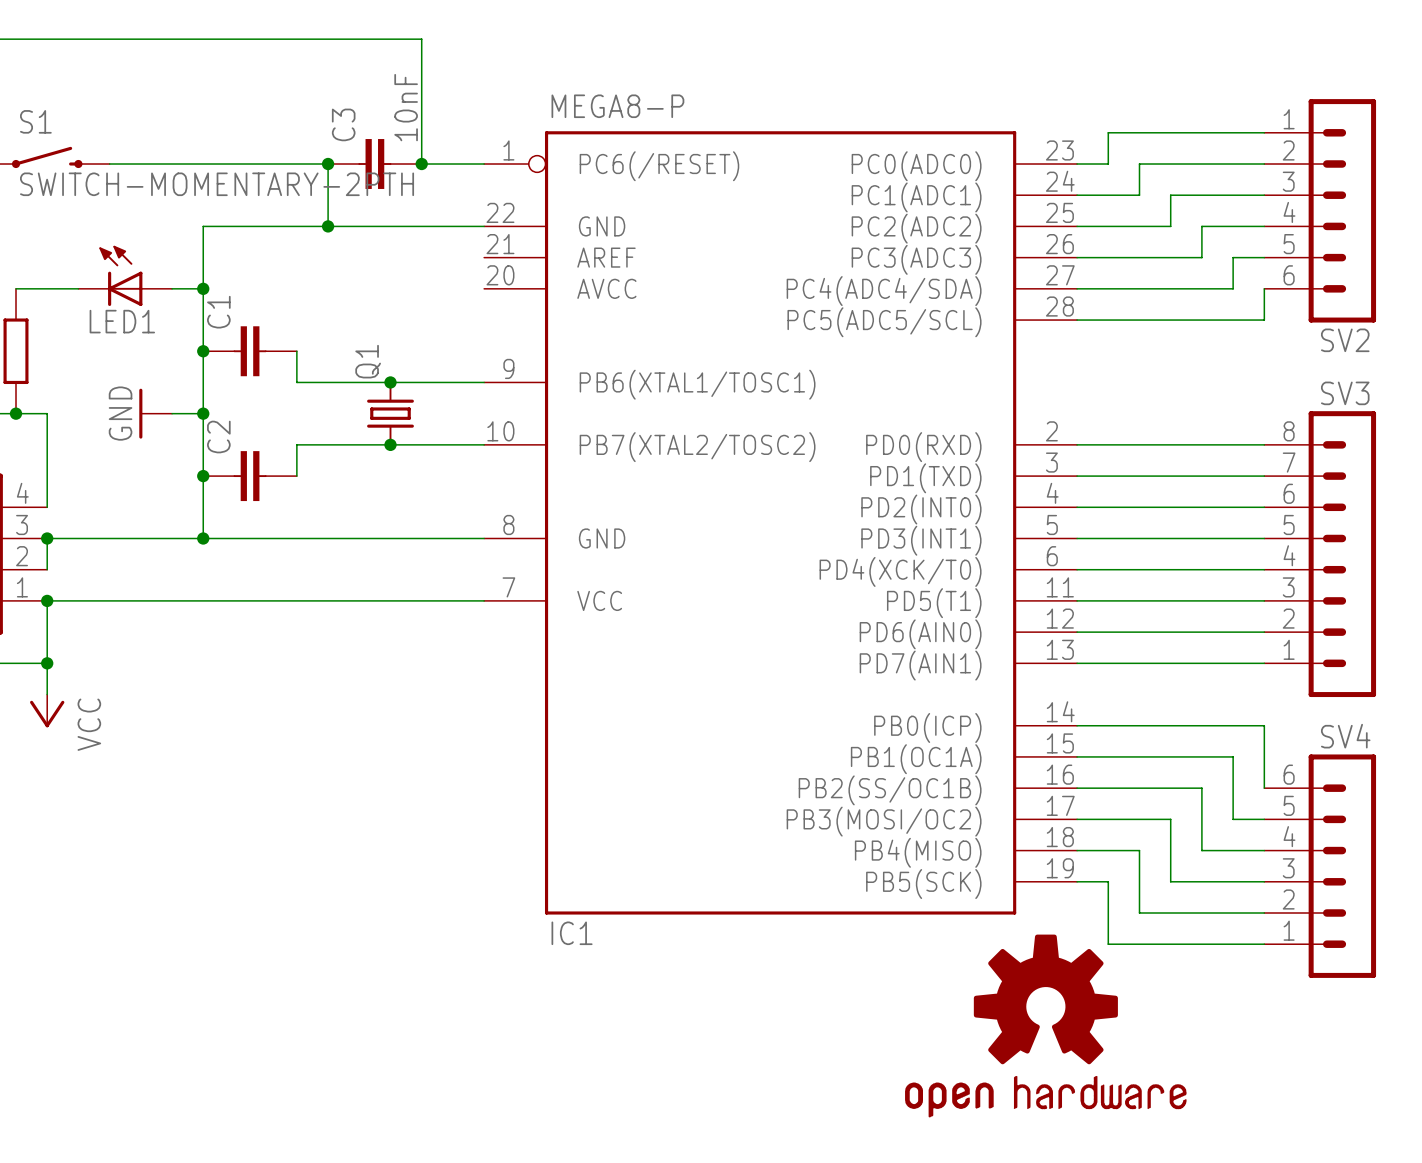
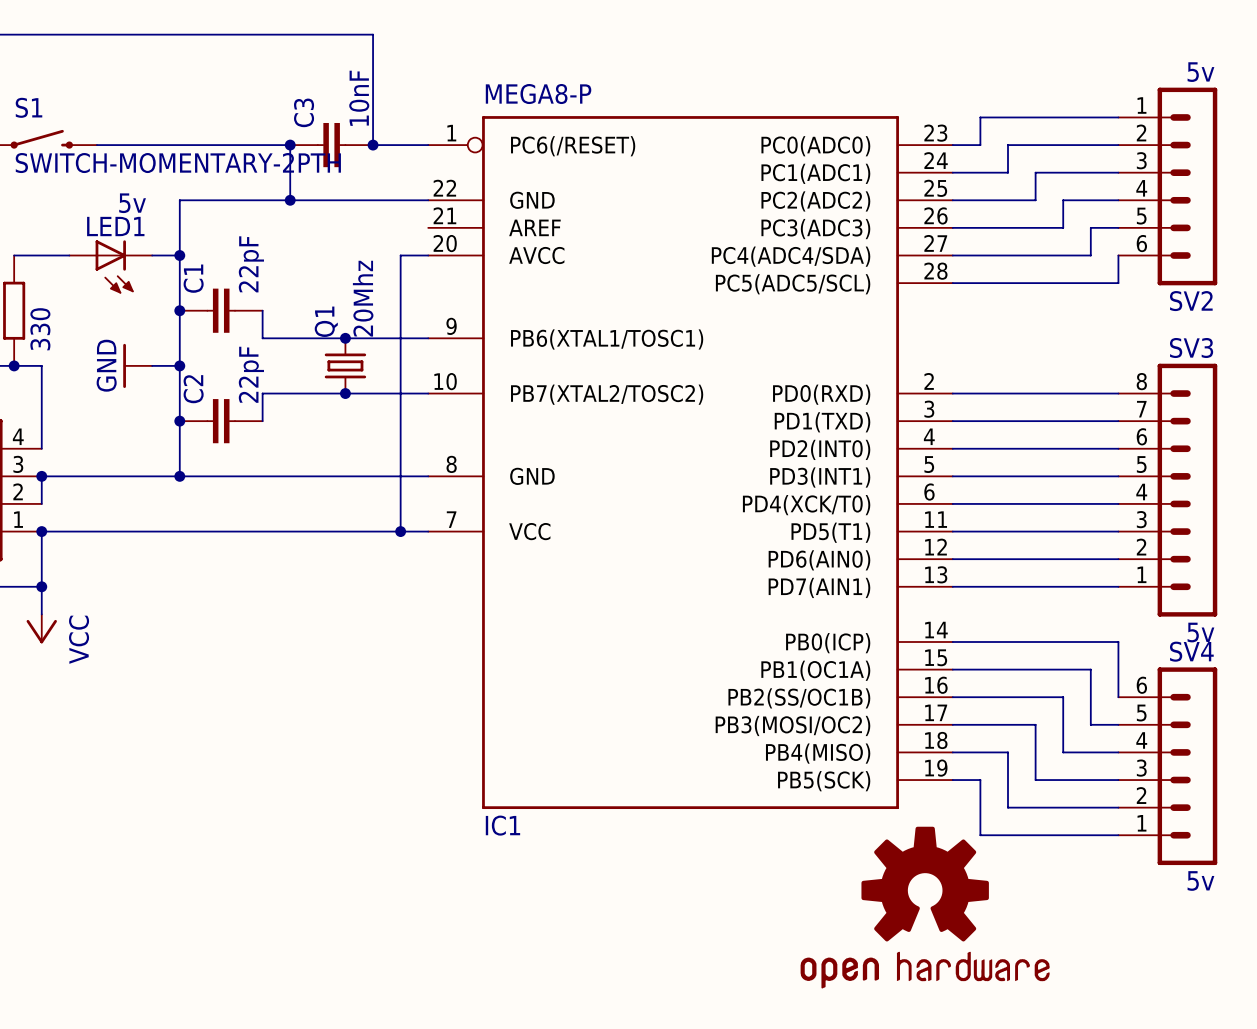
SV2 value: none -> 5v (1200, 72)
LED1 value: none -> 5v (132, 203)
LED1 rotation: 0° (120, 275) -> 180° (114, 266)
wire: none -> (428, 255) (400, 255) (400, 531)
C1 value: none -> 22pF (251, 264)
Q1 value: none -> 20Mhz (363, 298)
part value: none -> 330 (40, 329)
C2 value: none -> 22pF (251, 374)
junction: none -> (400, 531)
SV3 value: none -> 5v (1200, 632)
SV4 value: none -> 5v (1200, 880)

